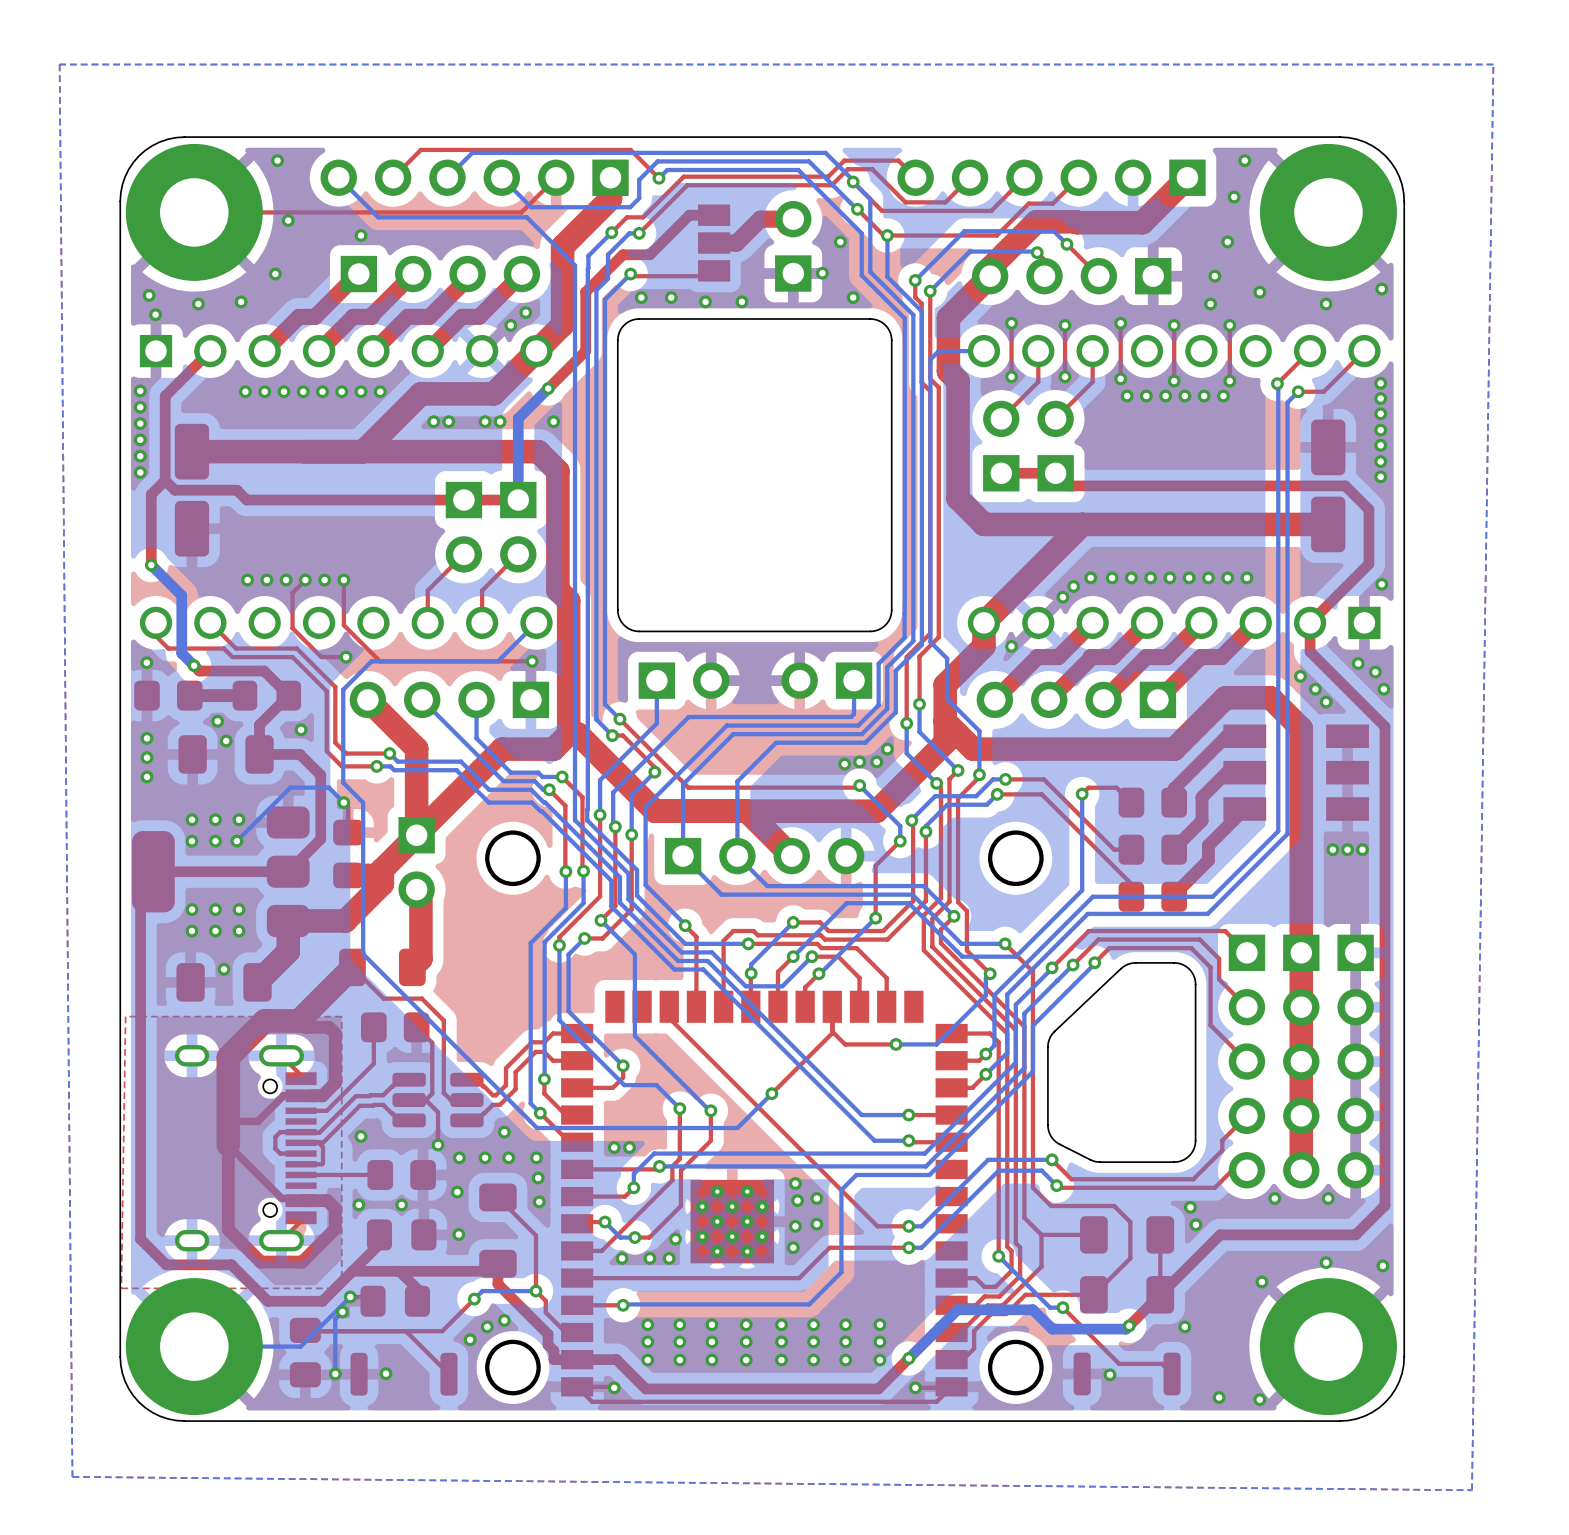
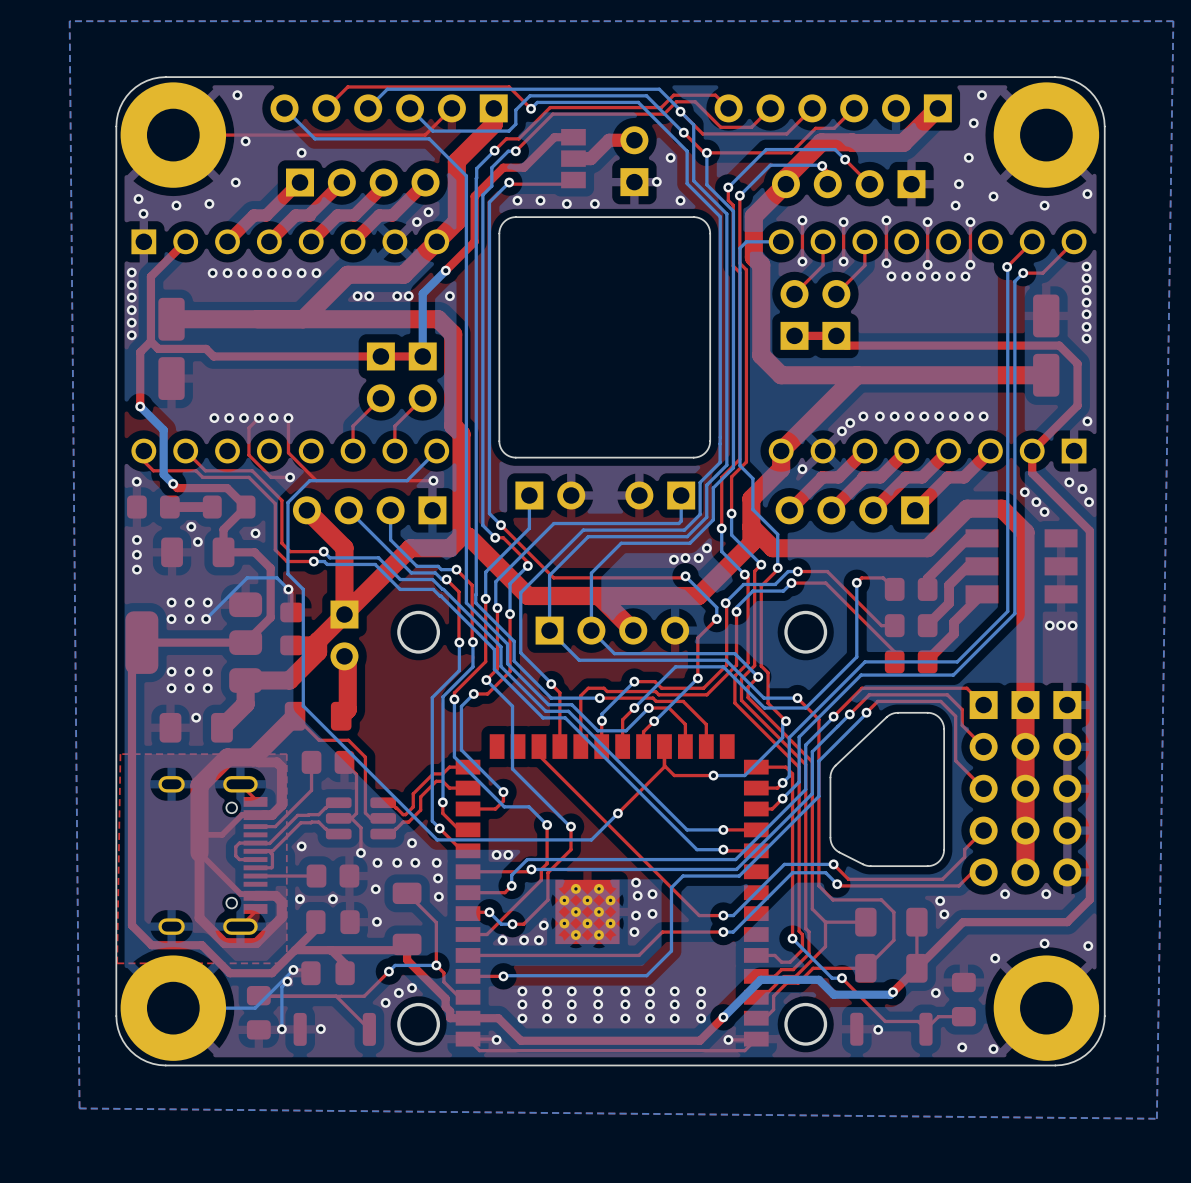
part: none -> (963, 999)
top track: none -> (963, 1016) (938, 1016) (925, 1029)

